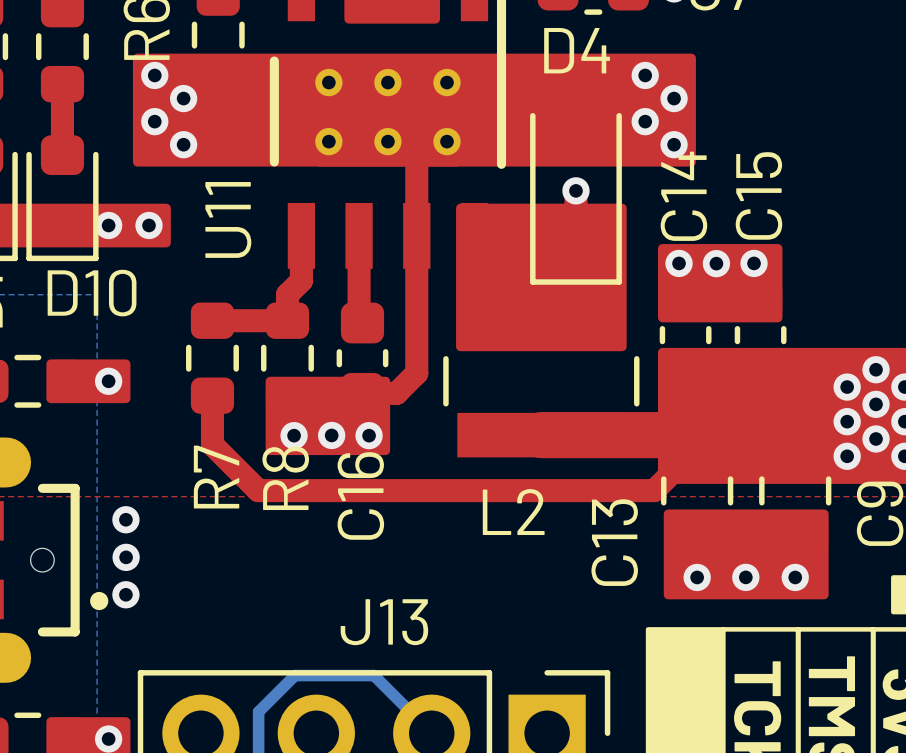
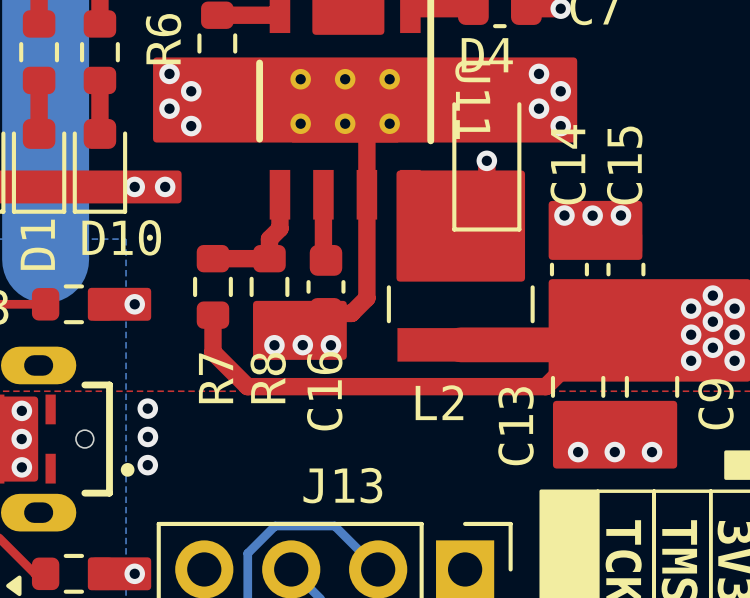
U11 name rotation: 0° (228, 219) -> 180° (472, 99)
U11 name position: U11 (228, 219) -> U11 (472, 99)

